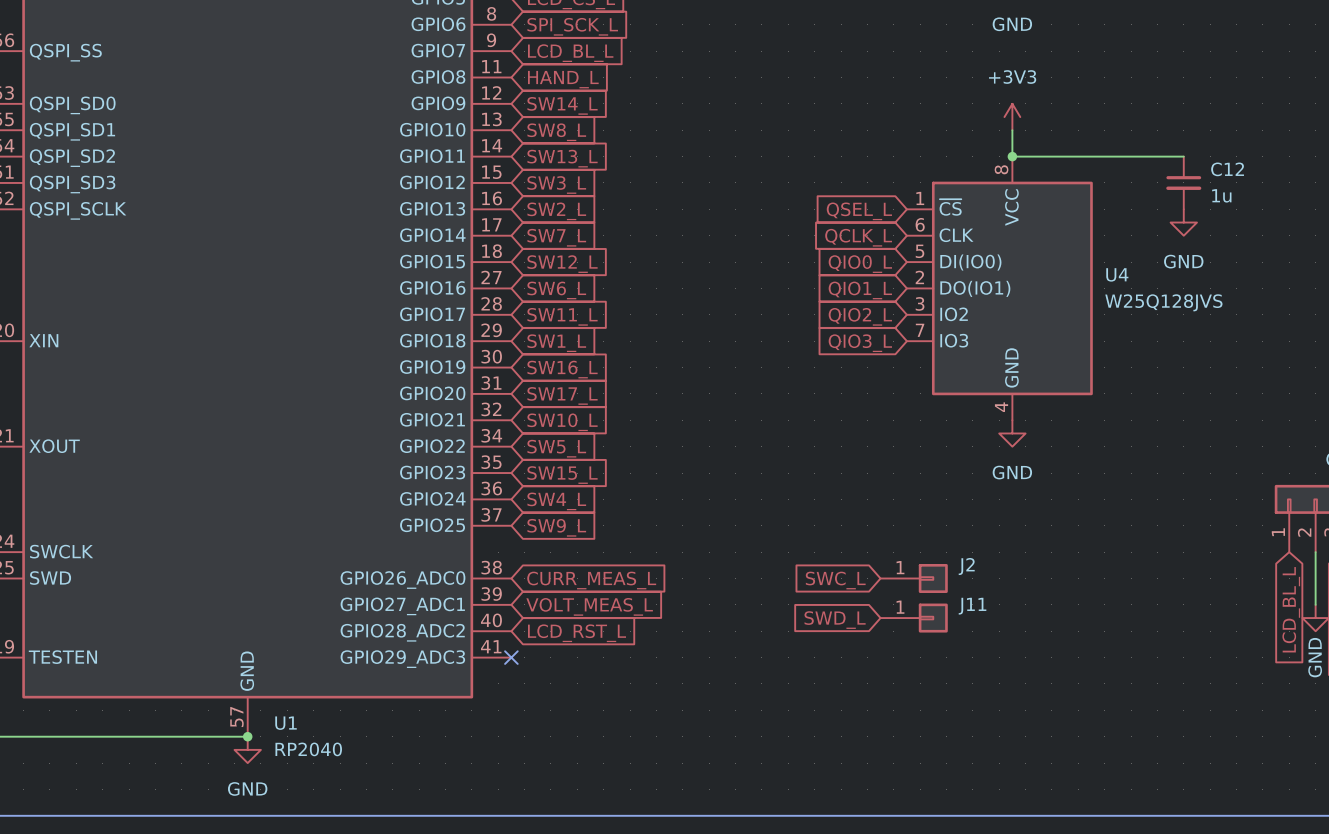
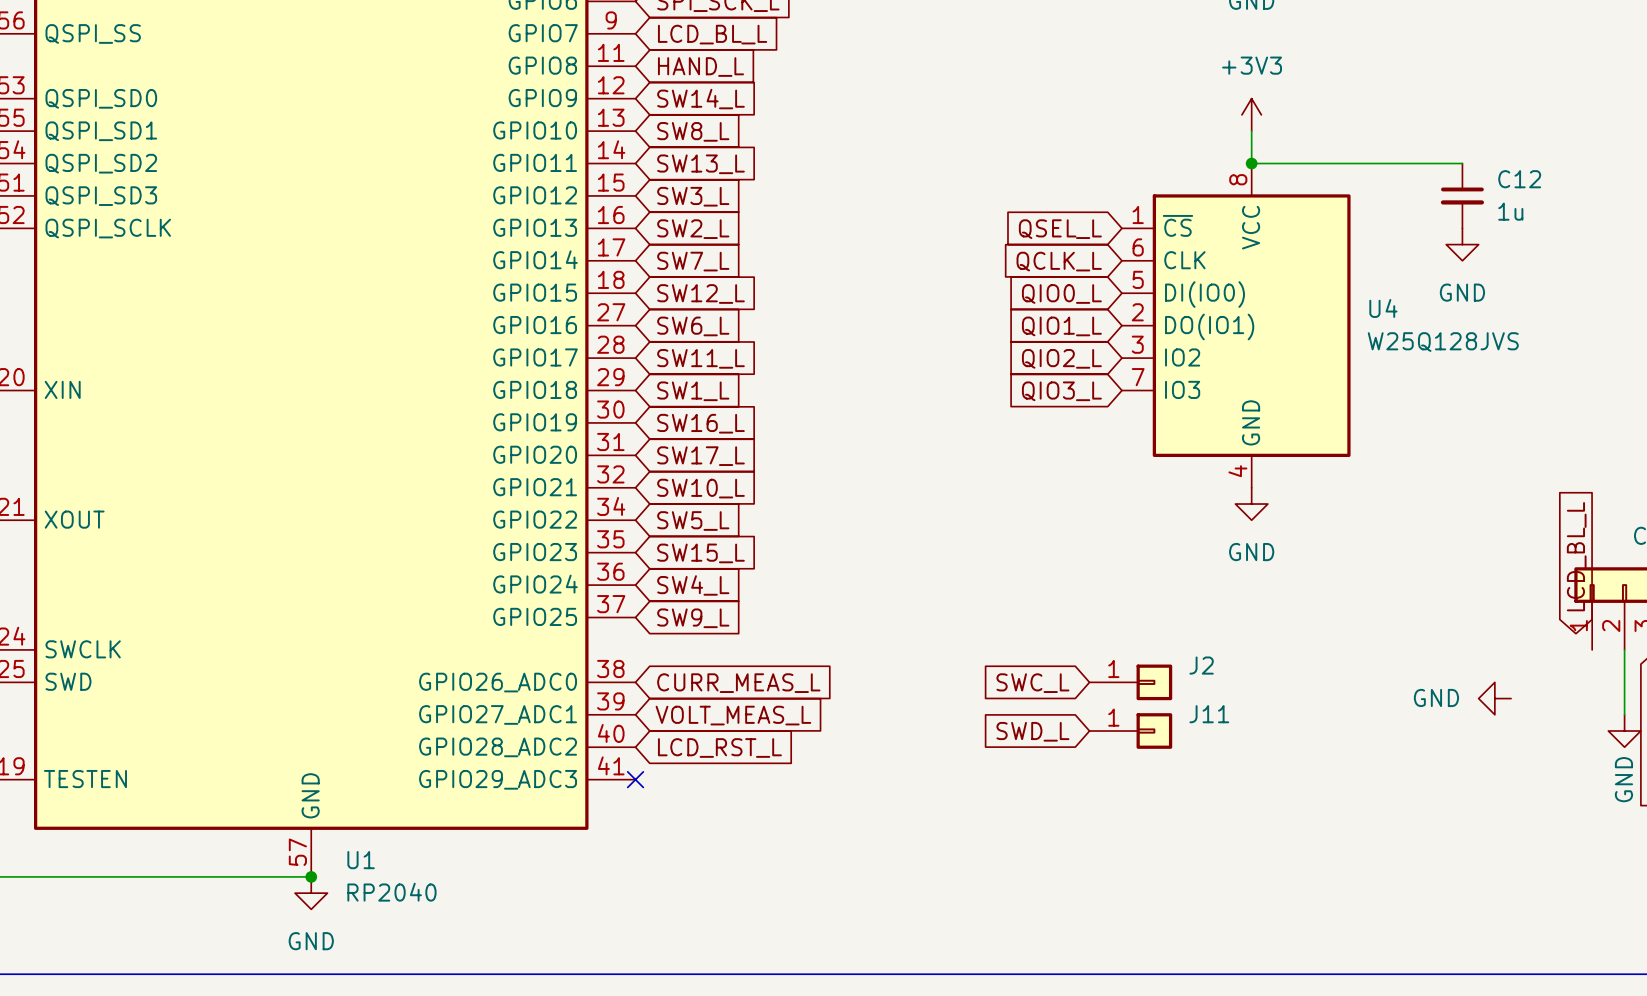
power symbol: none -> GND (1494, 698)
global label rotation: 0° (1291, 609) -> 180° (1576, 556)
global label position: LCD_BL_L (1291, 609) -> LCD_BL_L (1576, 556)

